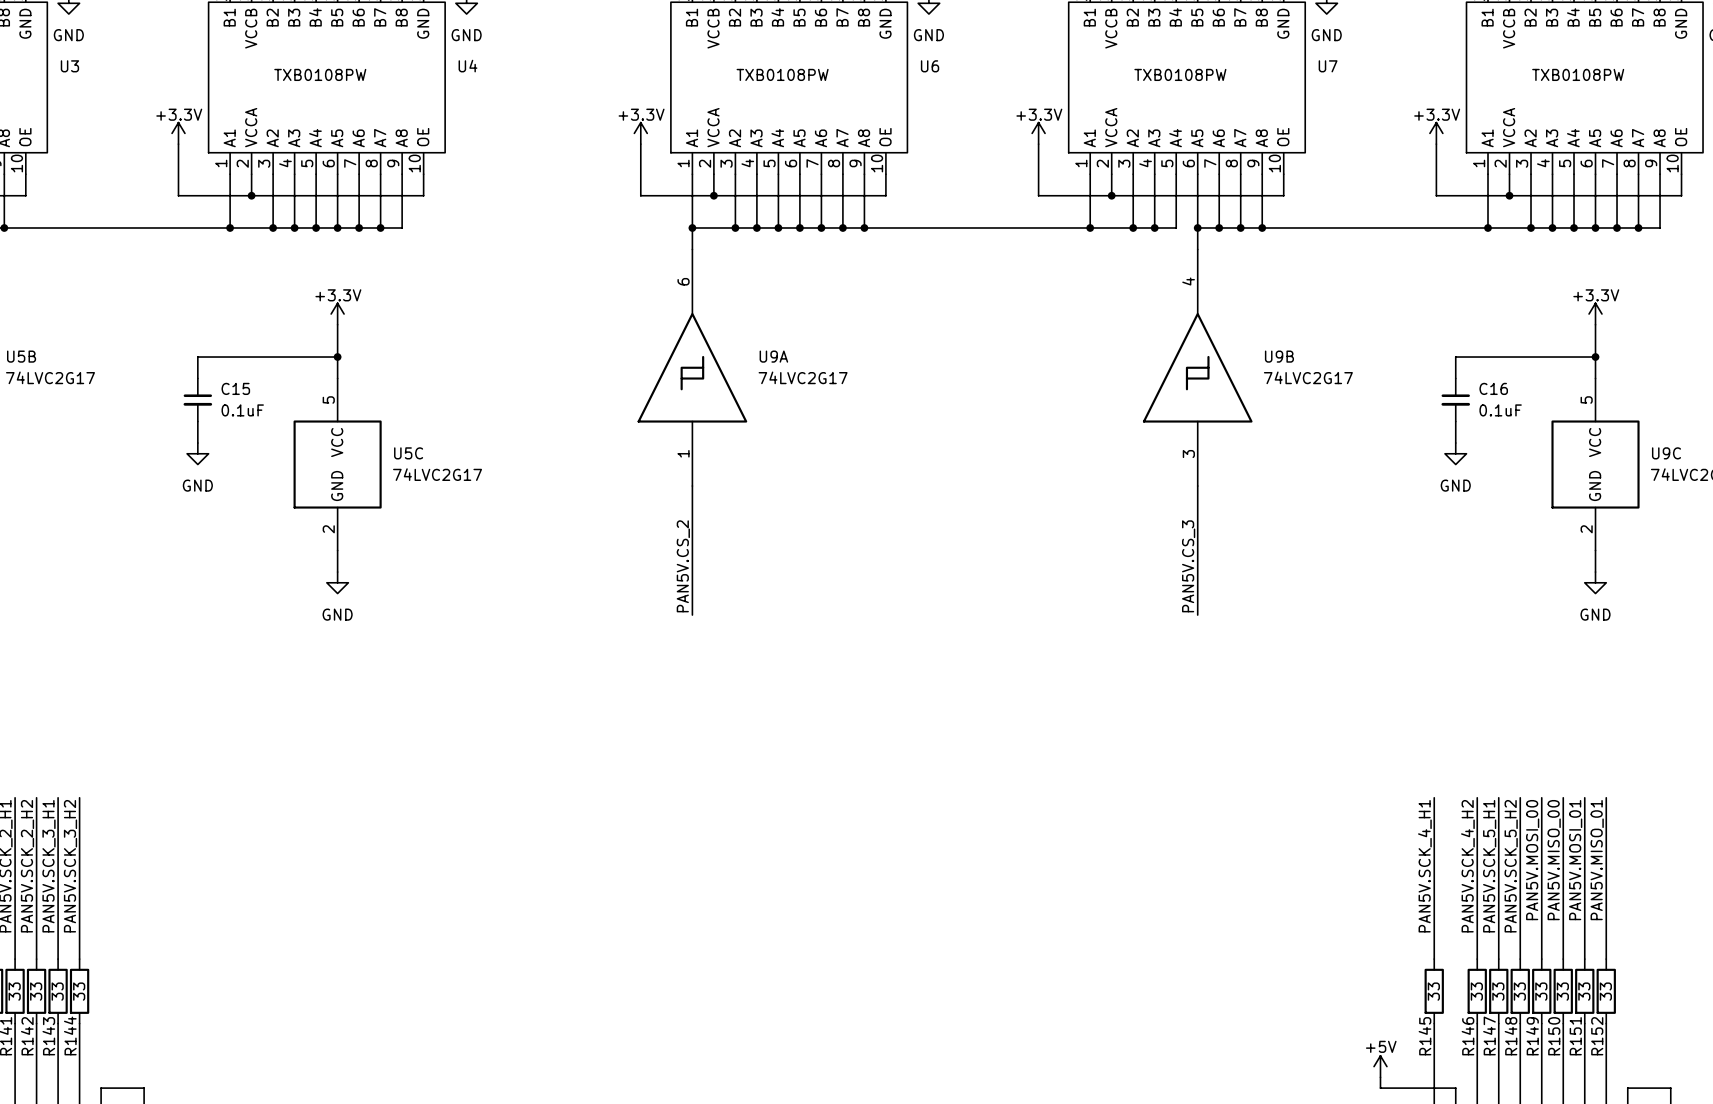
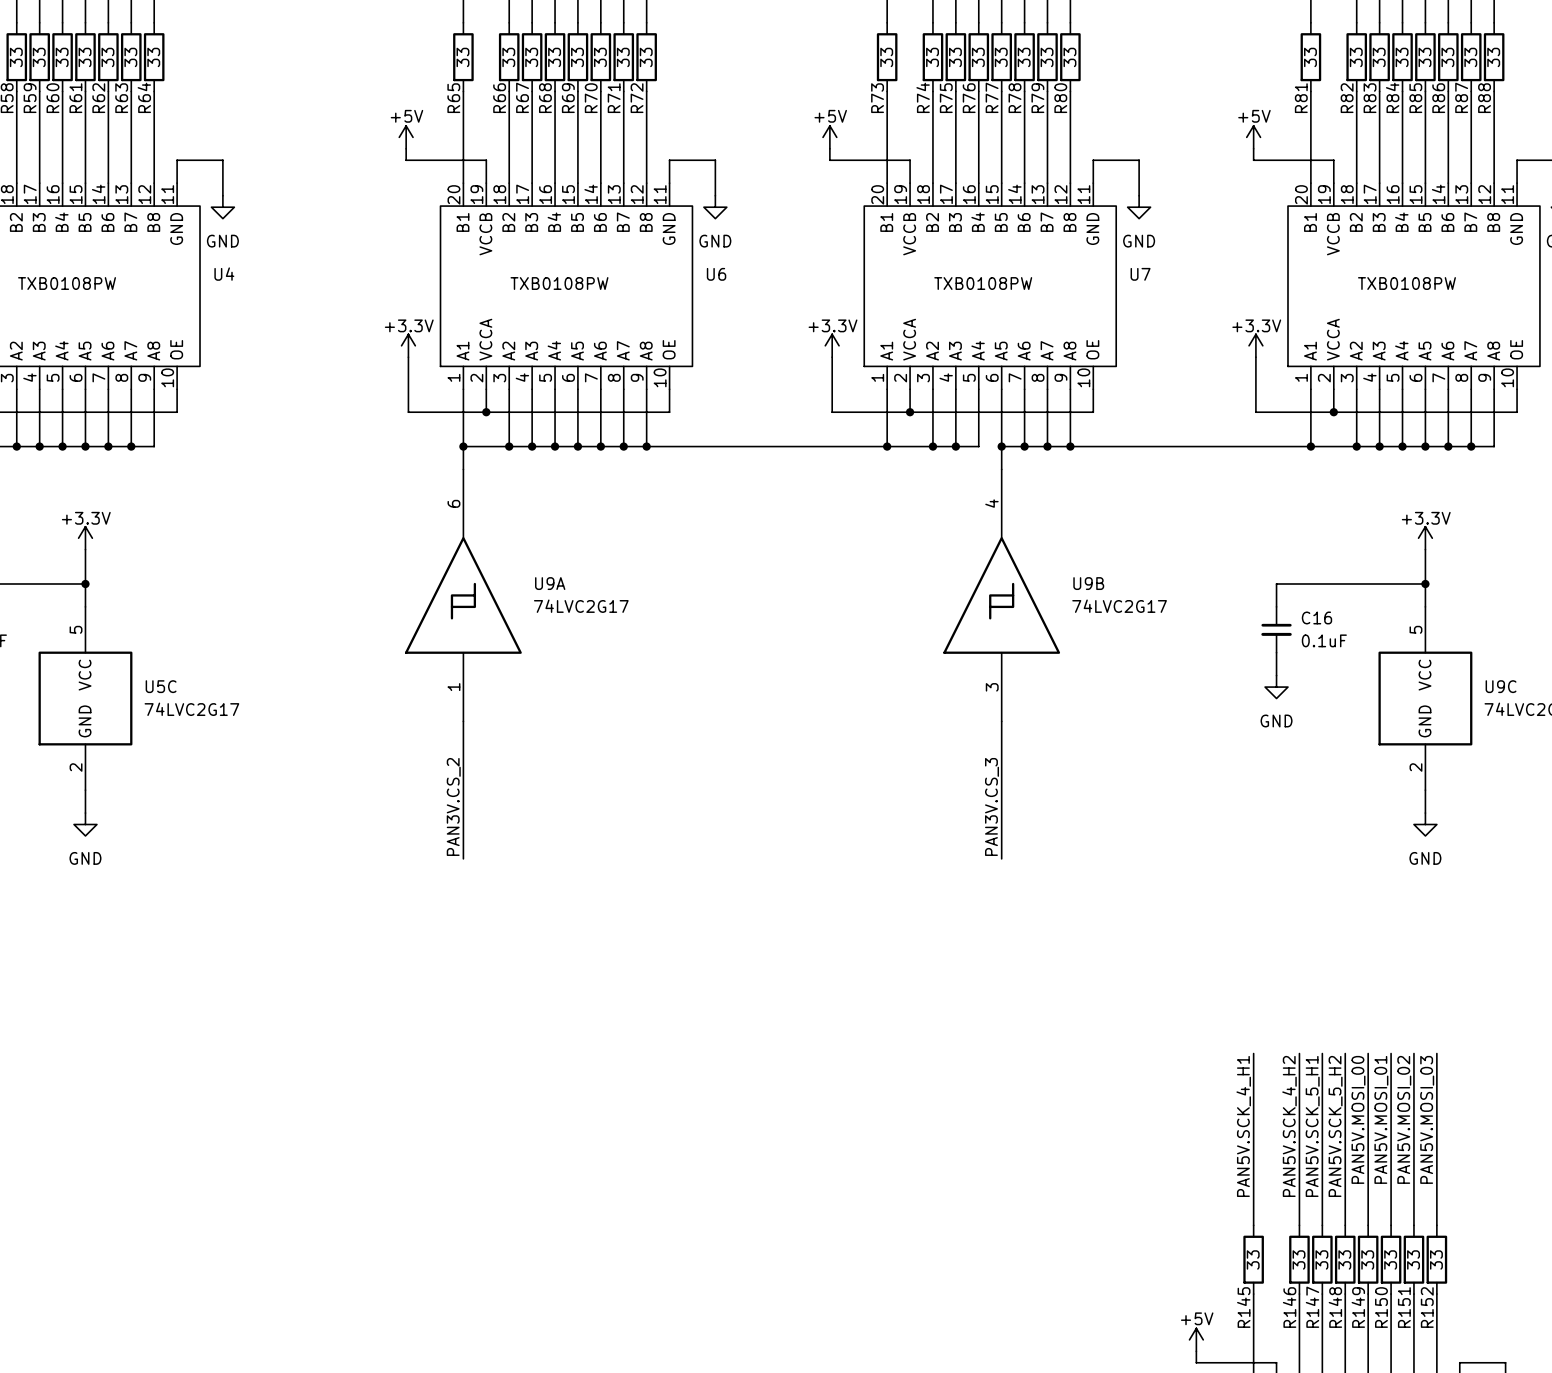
label: PAN5V.CS_2 (683, 566) -> PAN3V.CS_2 (453, 806)
label: PAN5V.CS_3 (1188, 566) -> PAN3V.CS_3 (992, 806)
label: PAN5V.MISO_00 (1554, 860) -> PAN5V.MOSI_01 (1381, 1119)
label: PAN5V.MOSI_01 (1575, 860) -> PAN5V.MOSI_02 (1404, 1119)
label: PAN5V.MISO_01 (1597, 860) -> PAN5V.MOSI_03 (1427, 1119)

